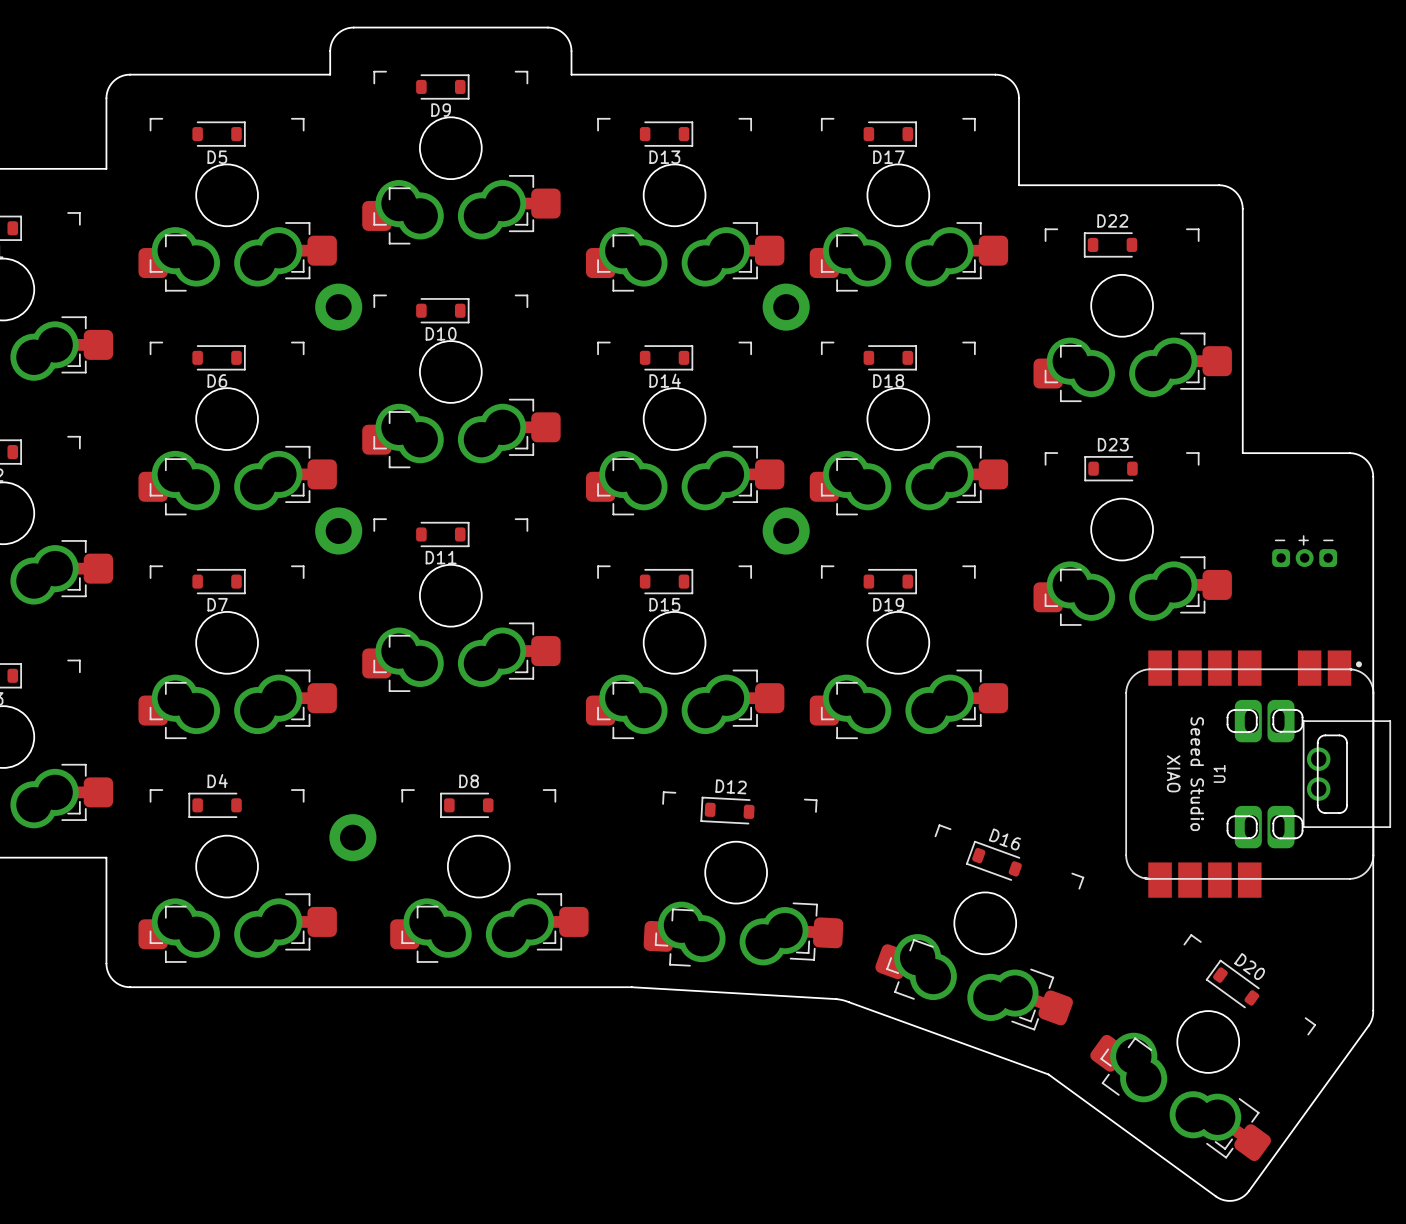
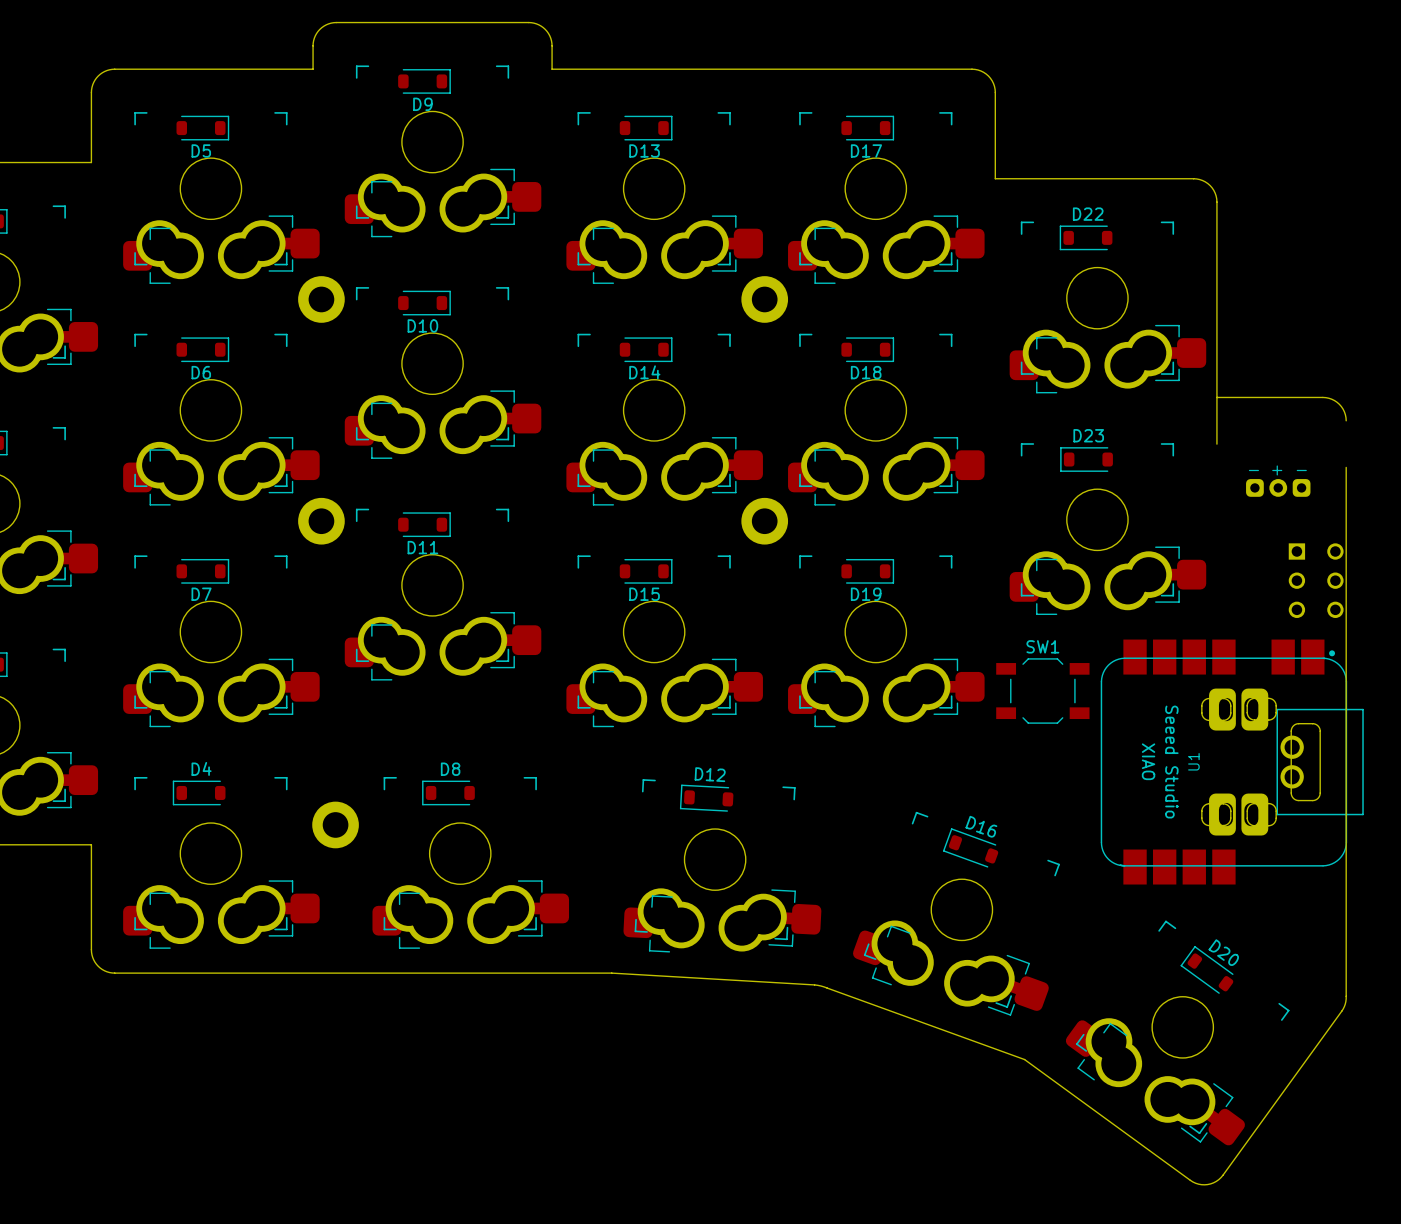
board edge: (1242, 453) (1352, 453) (1366, 460) (1371, 467) (1373, 476) -> (1216, 397) (1325, 397) (1339, 404) (1344, 411) (1346, 420)
part position: (1304, 558) -> (1278, 487)
part: none -> (1316, 580)
SW1: none -> (1042, 691)

